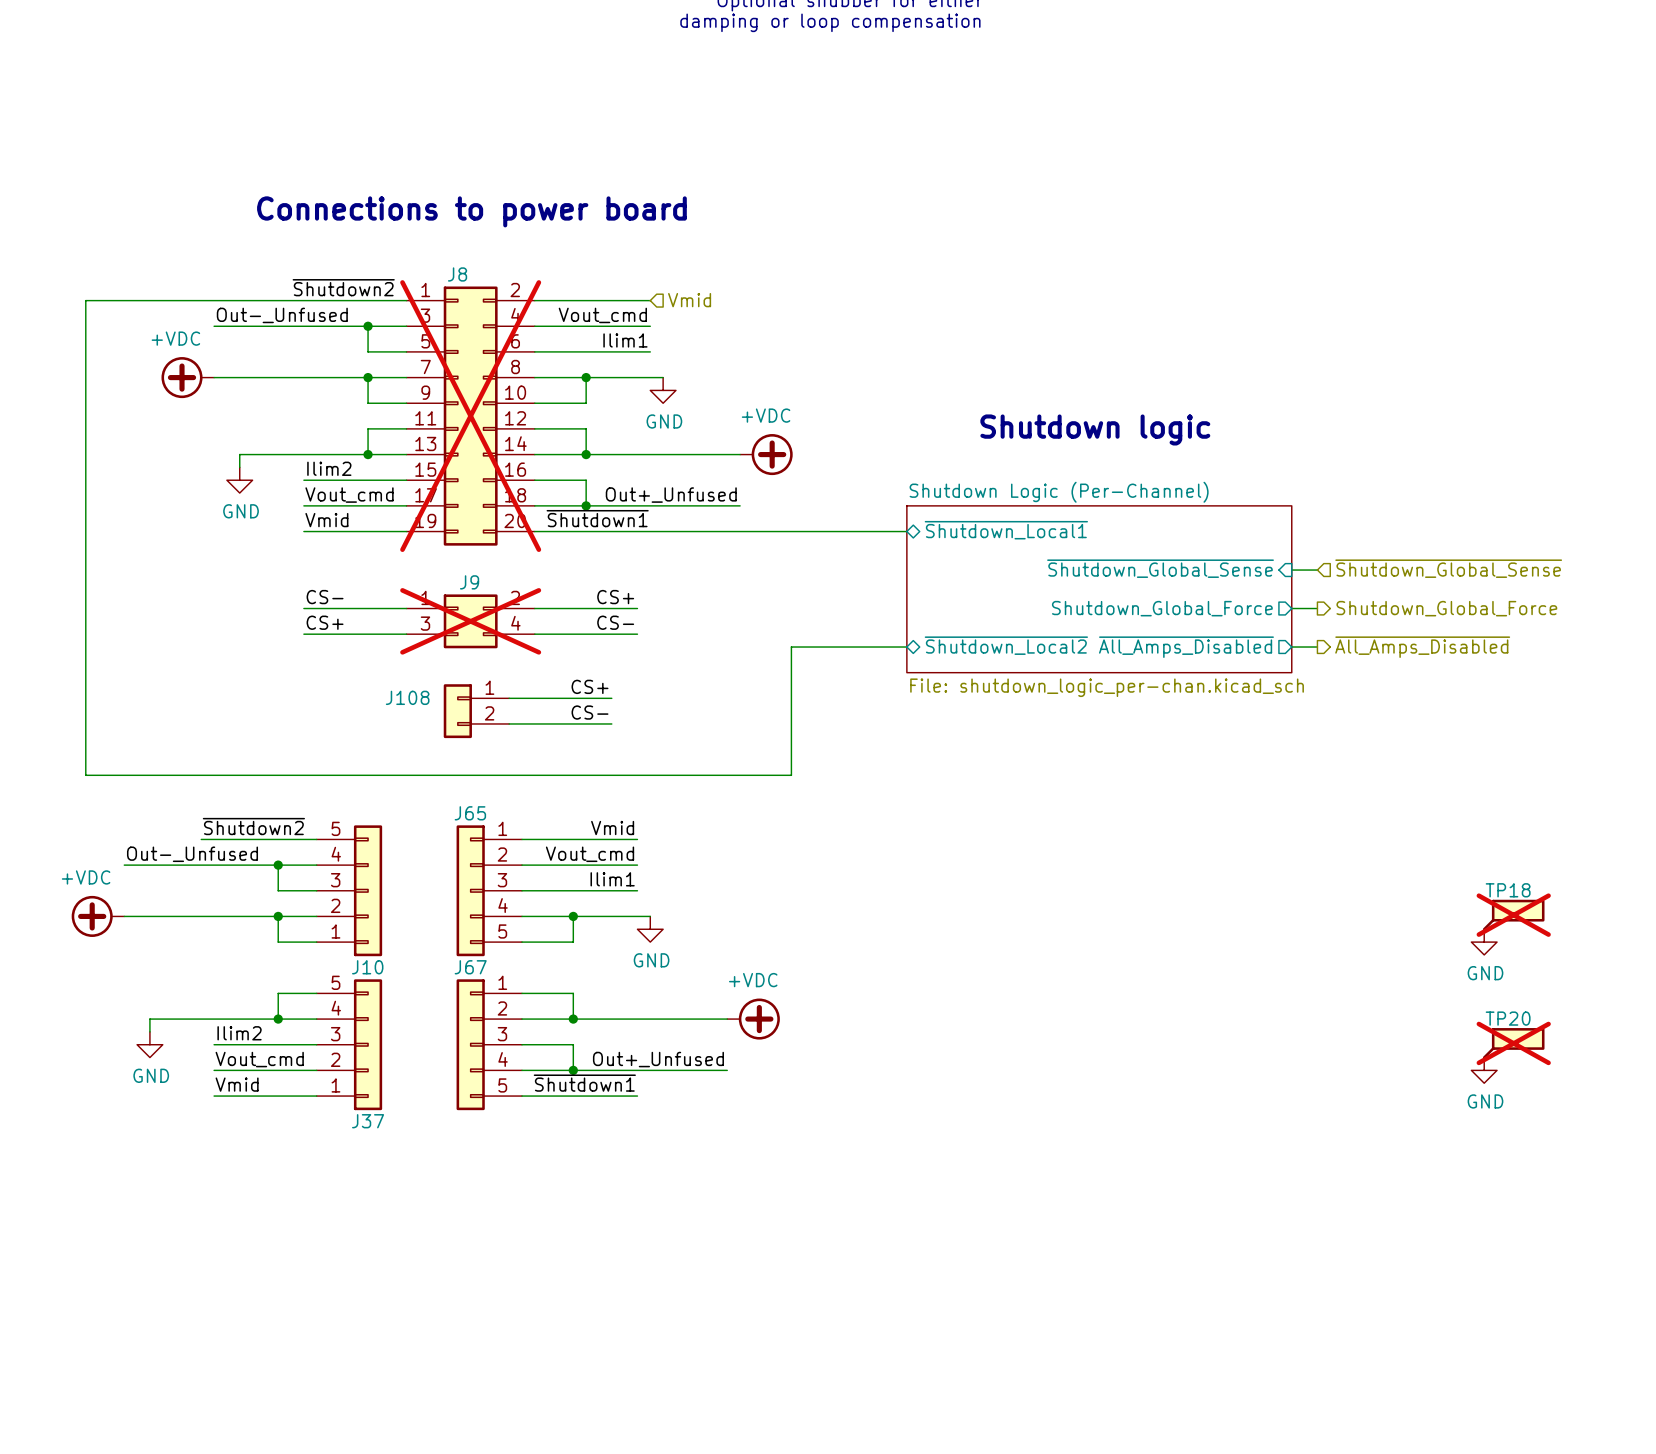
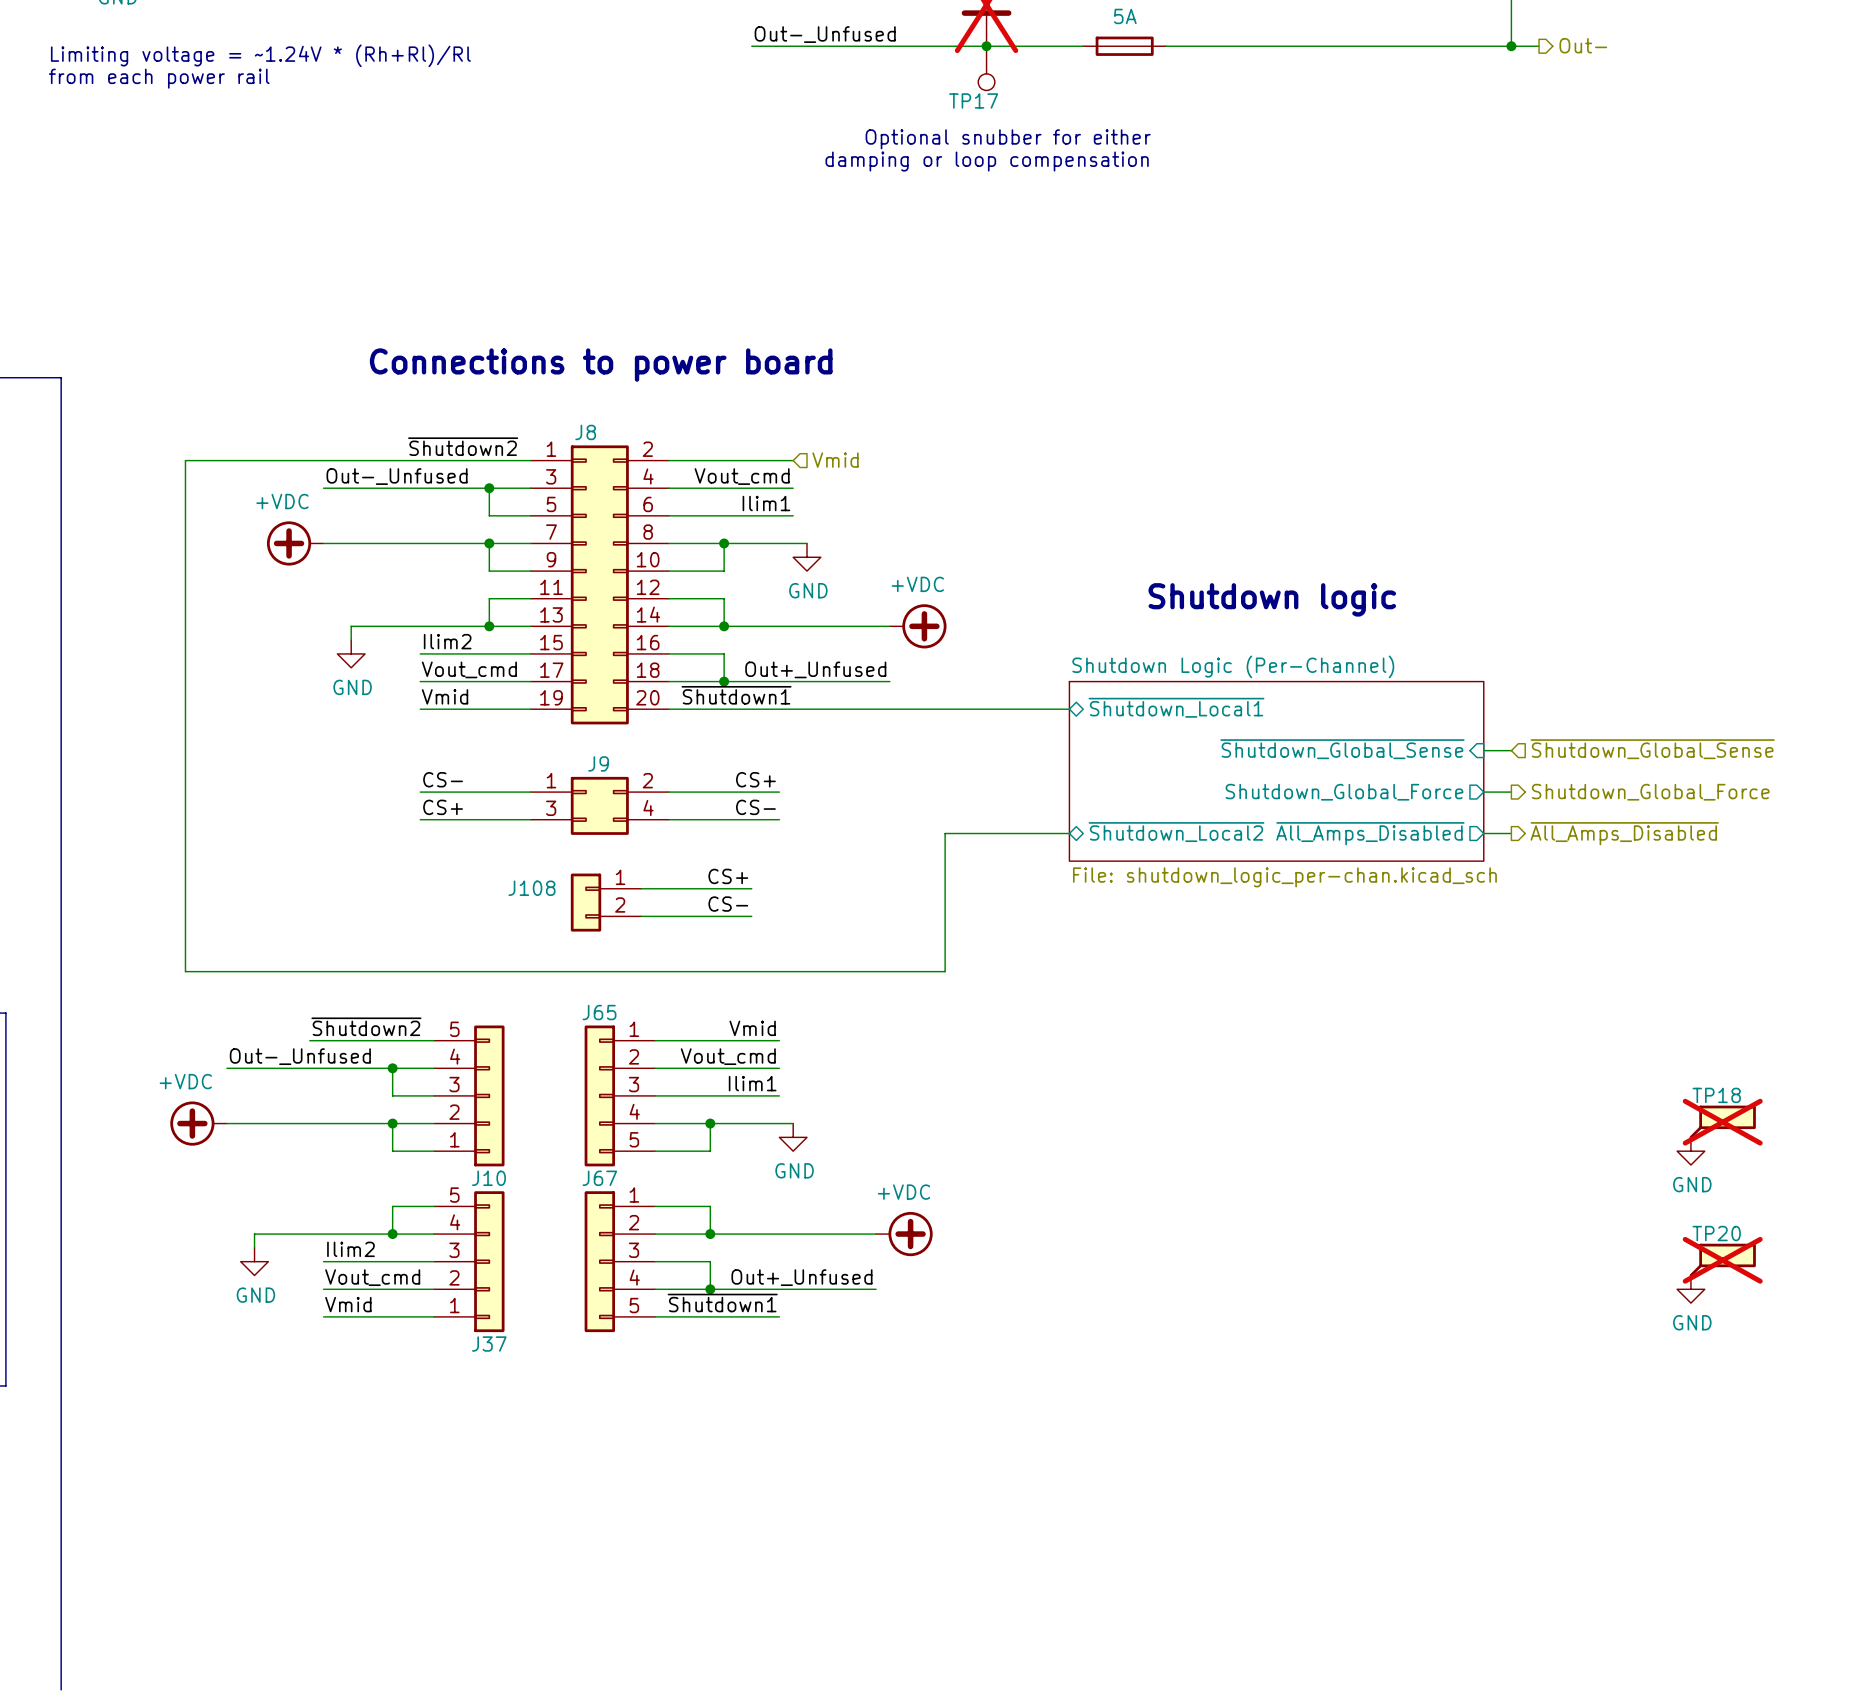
J8 do-not-place cross: (470, 416) -> none
J9 do-not-place cross: (470, 621) -> none

